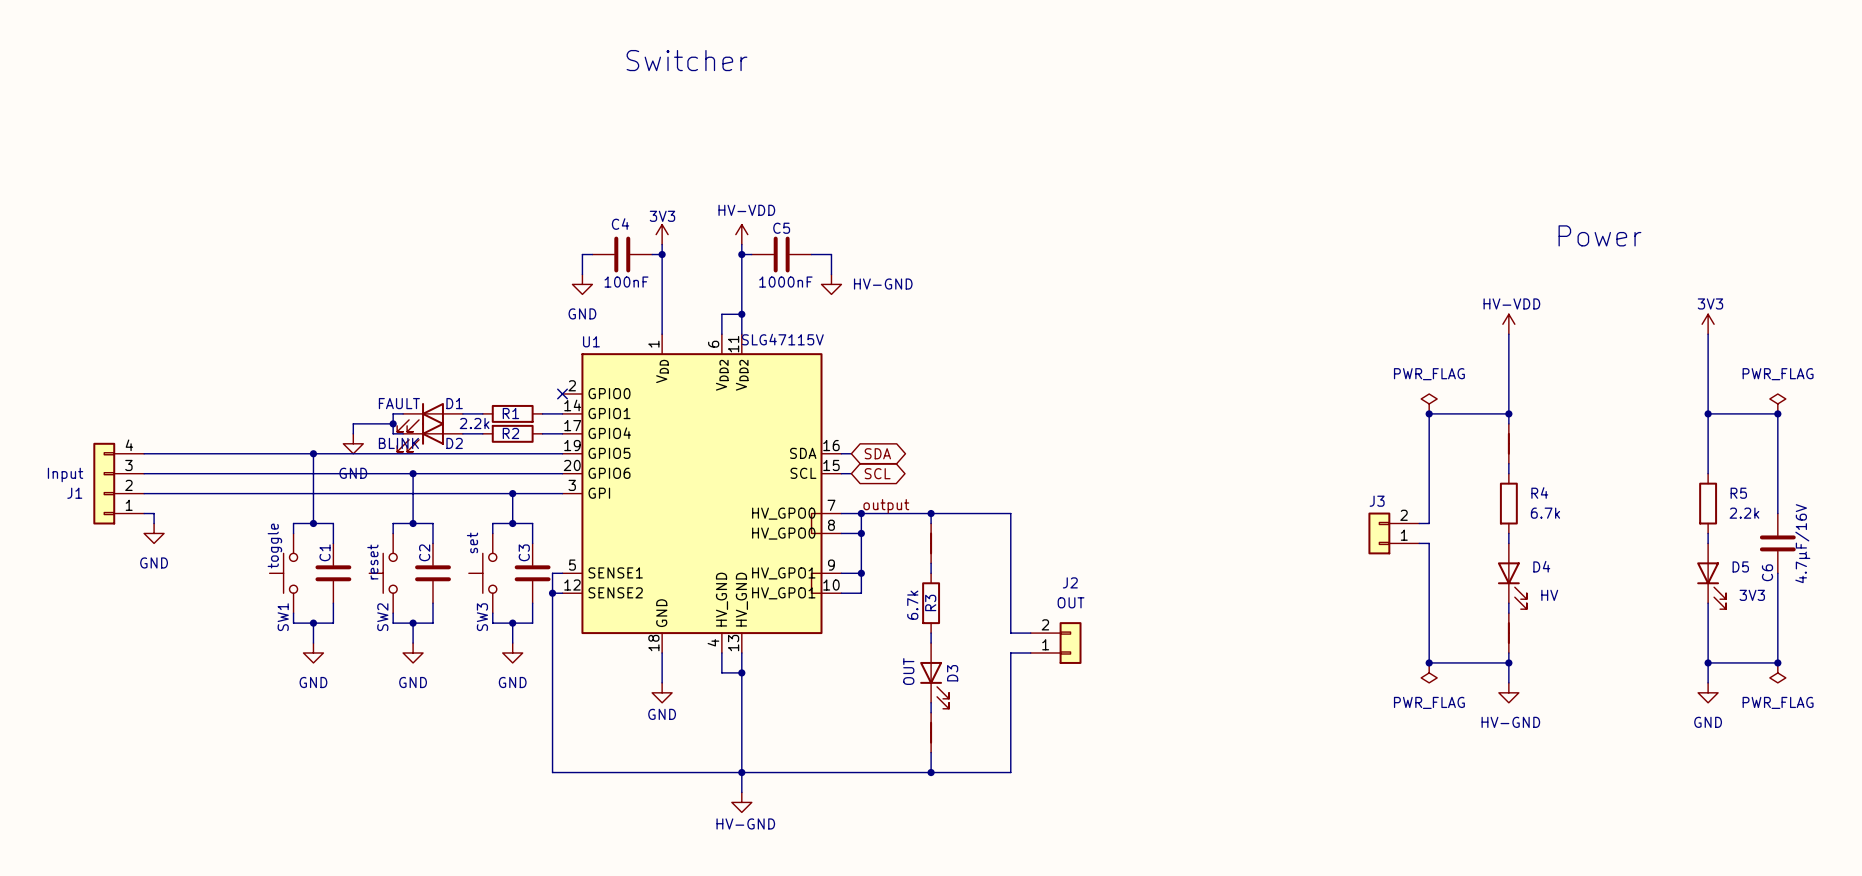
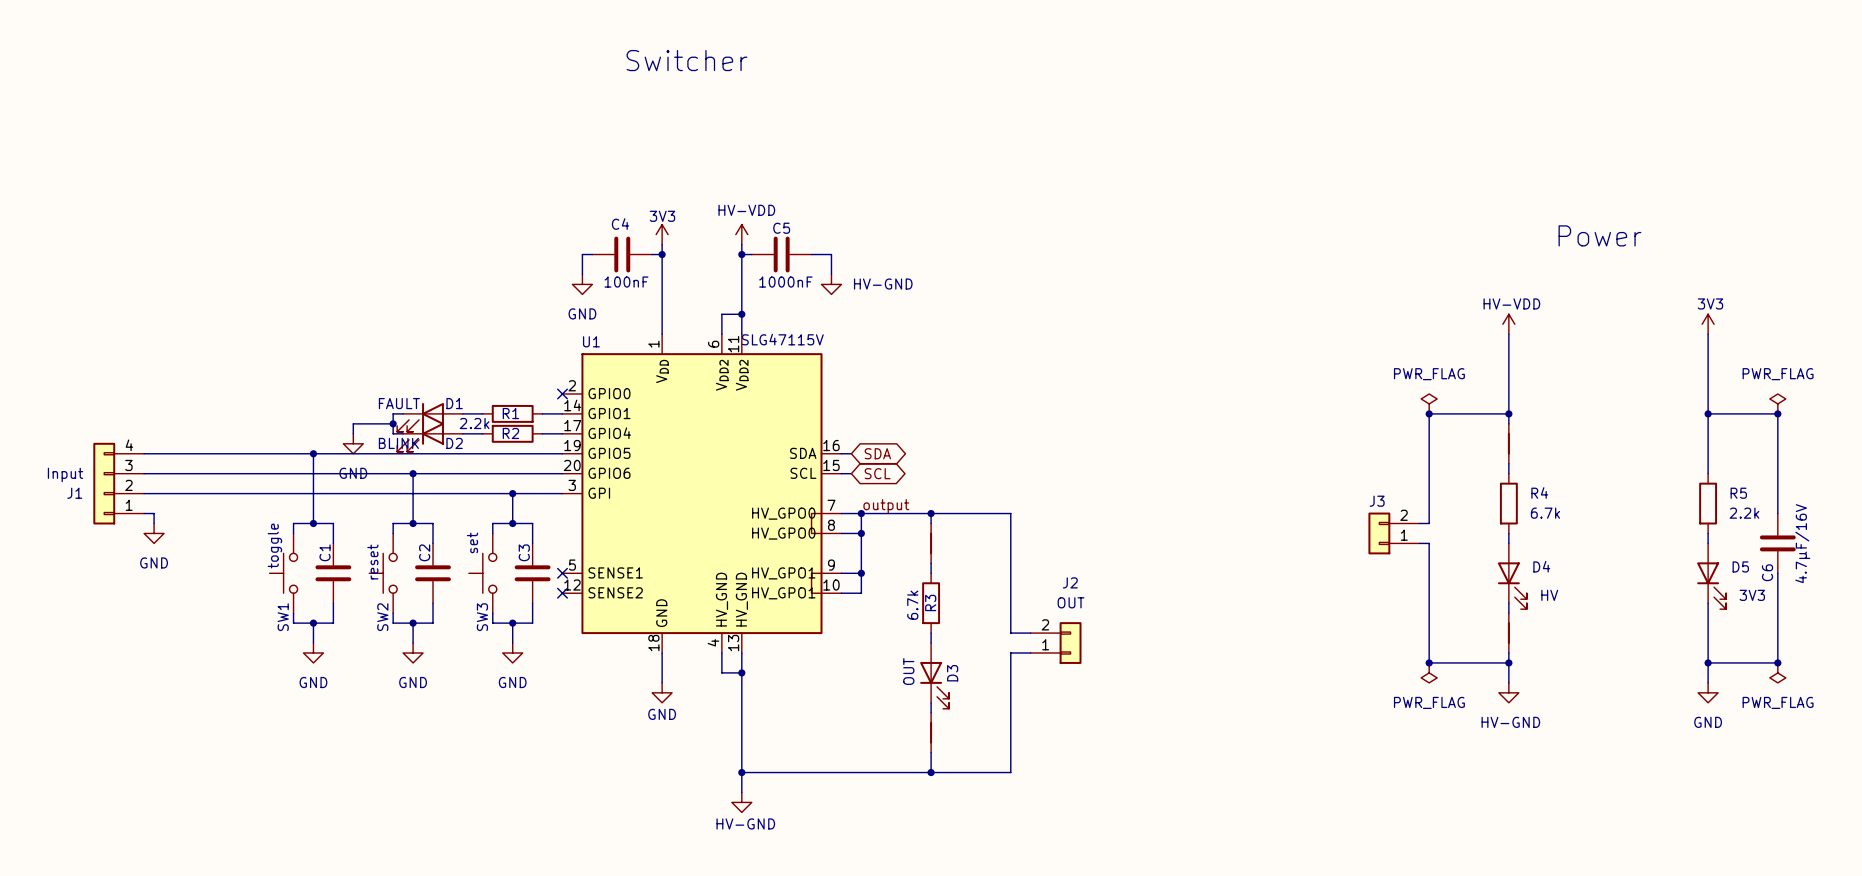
wire: (562, 573) (552, 573) (552, 772) (741, 772) -> none
no-connect mark: none -> (562, 573)
wire: (552, 593) (562, 593) -> none
junction: (552, 593) -> none
no-connect mark: none -> (562, 593)

